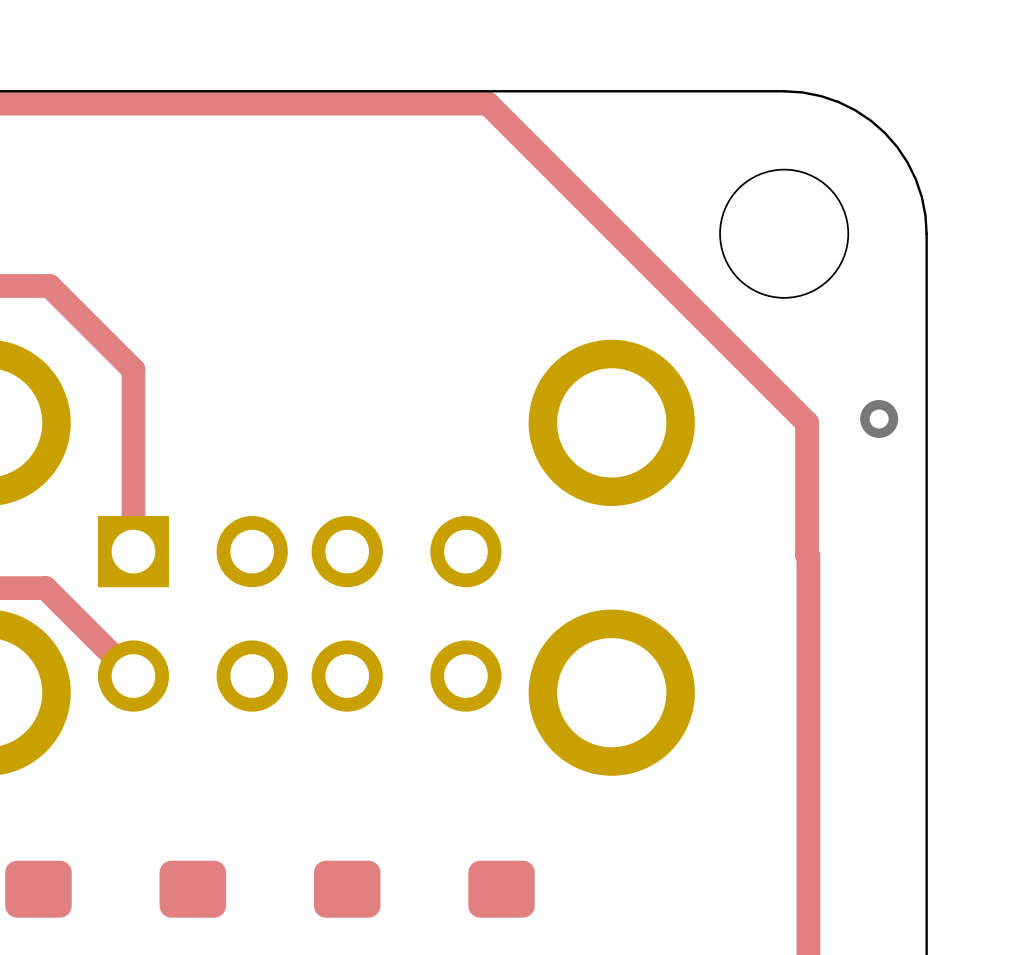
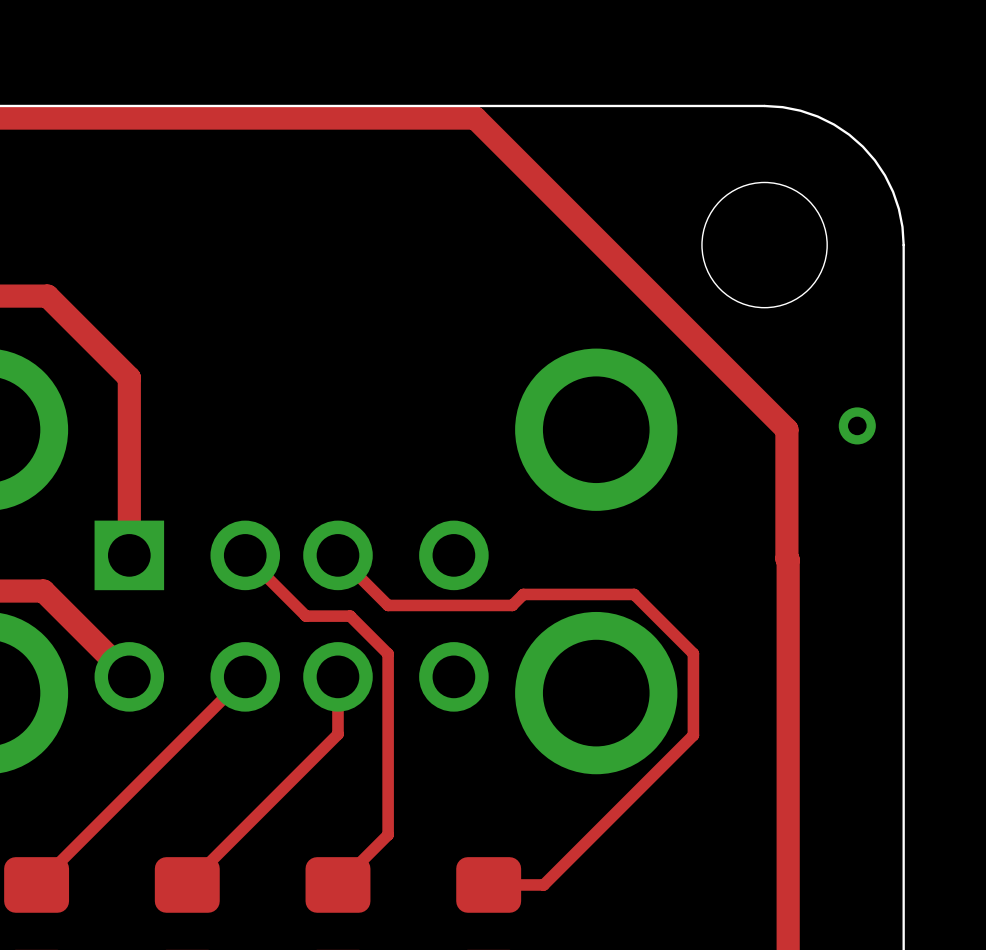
top track: none -> (245, 555) (305, 616) (350, 616) (388, 654) (388, 834) (337, 884)
top track: none -> (337, 555) (388, 605) (512, 605) (523, 594) (634, 594) (693, 653) (693, 735) (543, 884) (488, 884)
top track: none -> (245, 676) (37, 884)
top track: none -> (337, 676) (337, 734) (187, 884)

